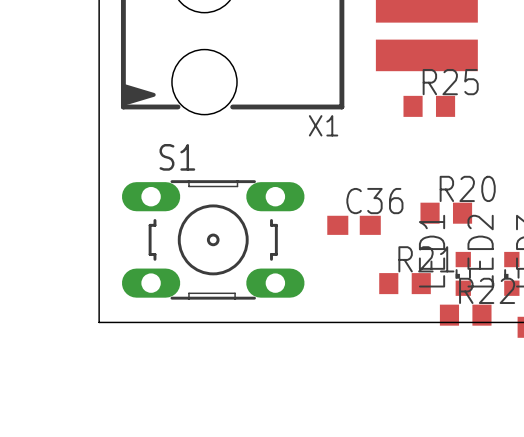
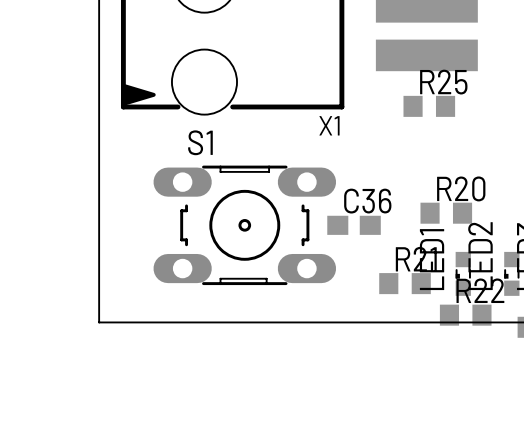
S1 position: (213, 239) -> (244, 225)

